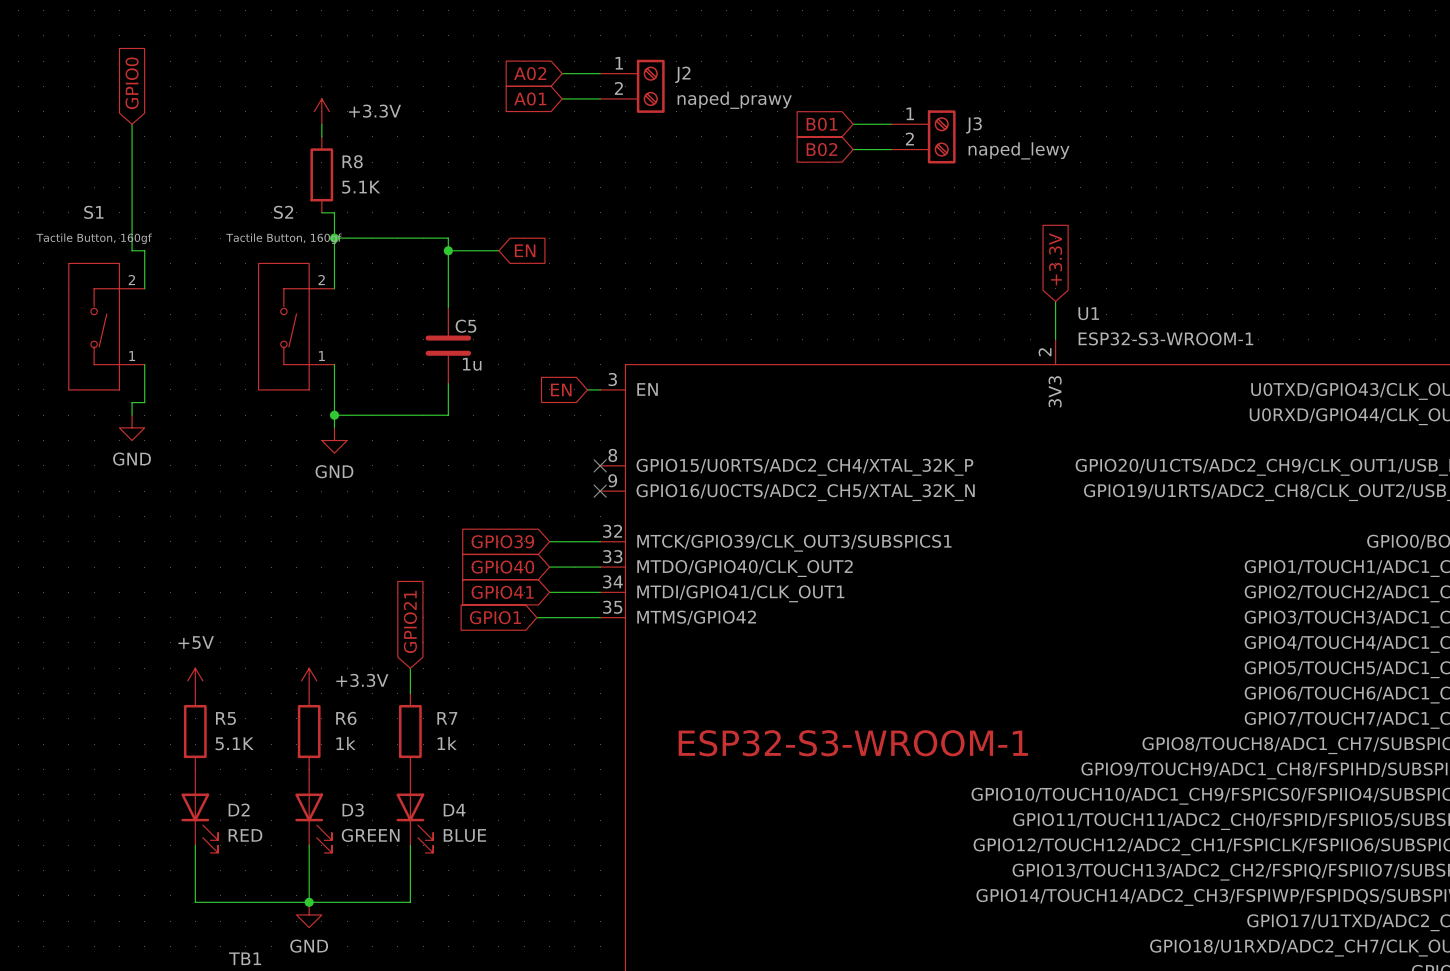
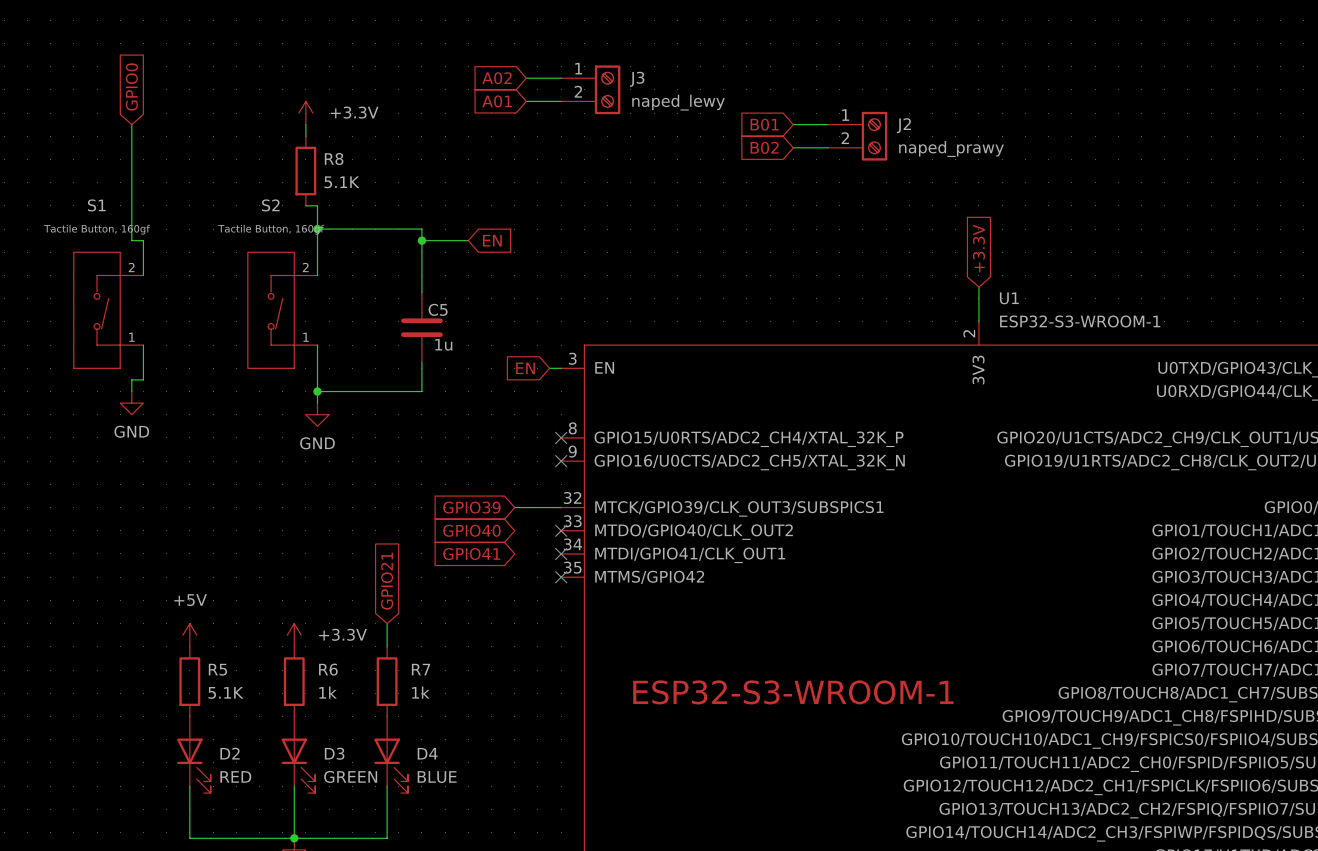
J2 name: J2 (682, 74) -> J3 (637, 79)
J2 value: naped_prawy (734, 100) -> naped_lewy (678, 102)
J3 name: J3 (973, 125) -> J2 (903, 125)
J3 value: naped_lewy (1019, 150) -> naped_prawy (951, 149)
wire: (549, 567) (600, 567) -> none
no-connect mark: none -> (561, 530)
wire: (549, 592) (600, 592) -> none
no-connect mark: none -> (561, 553)
global label: GPIO1 (495, 617) -> none
wire: (536, 617) (600, 617) -> none
no-connect mark: none -> (561, 577)

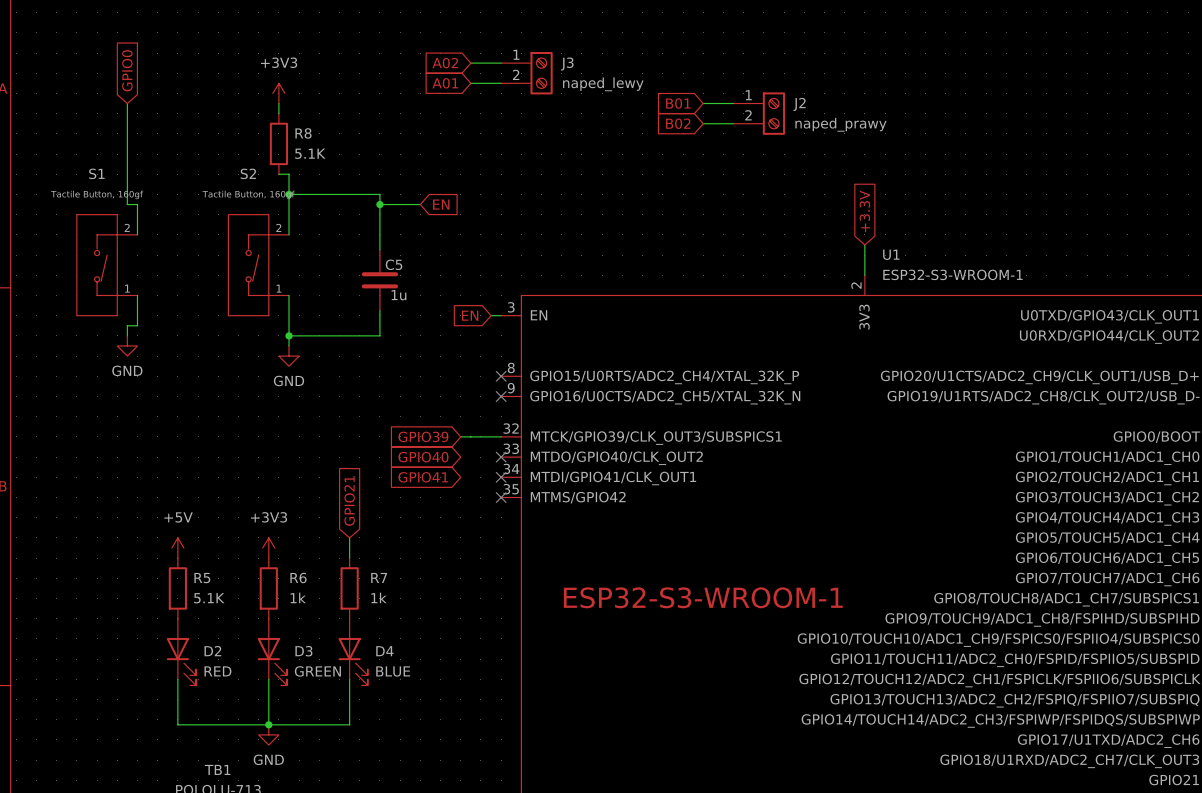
power symbol: +3.3V (305, 113) -> +3V3 (278, 93)
power symbol: +3.3V (294, 635) -> +3V3 (268, 548)

